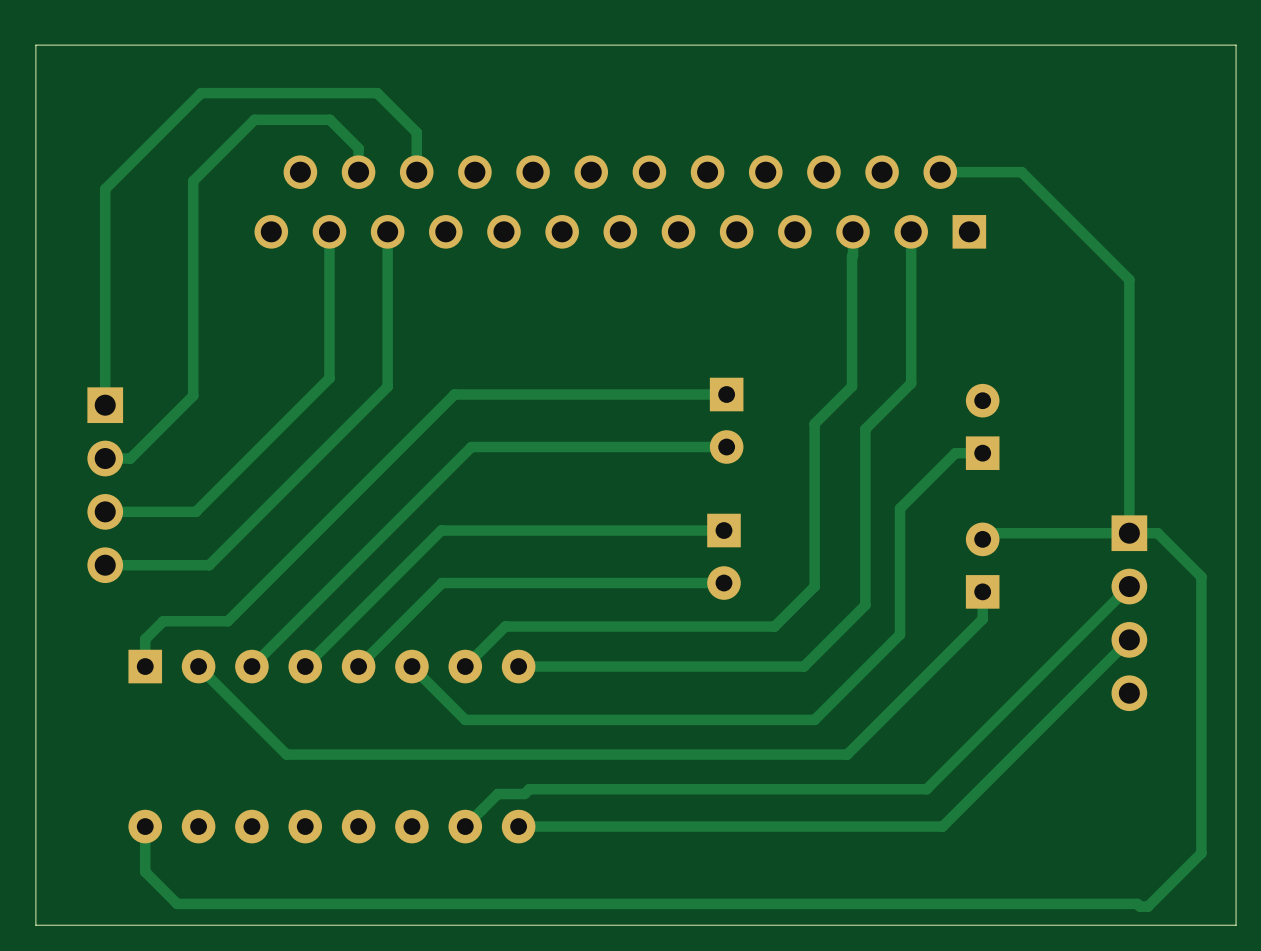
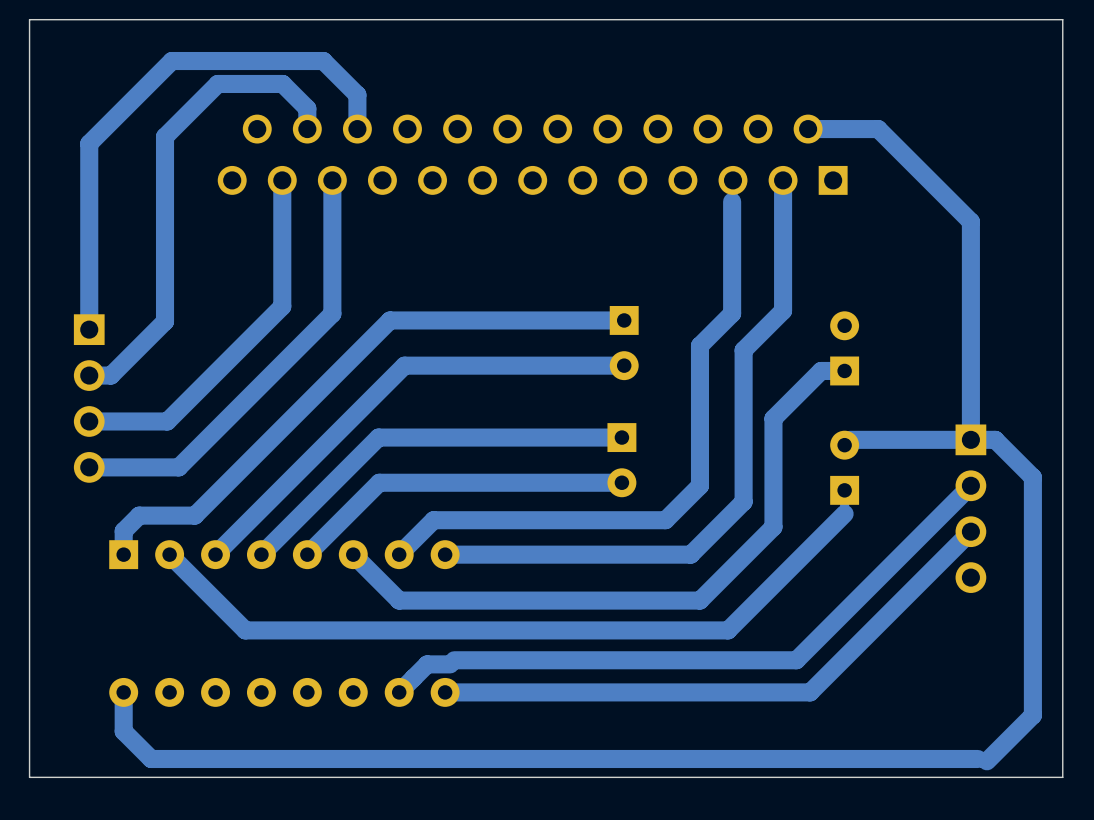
track width: thin (358, 172) (358, 148) (329, 119) (254, 119) (193, 181) (193, 395) (130, 458) (105, 458) -> thick (307, 129) (307, 108) (282, 83) (217, 83) (165, 136) (165, 321) (110, 375) (89, 375)
track width: thin (416, 172) (416, 132) (377, 93) (201, 93) (105, 189) (105, 405) -> thick (357, 129) (357, 94) (323, 61) (171, 61) (89, 143) (89, 329)
track width: thin (940, 172) (1021, 172) (1129, 279) (1129, 533) -> thick (808, 129) (878, 129) (970, 221) (970, 439)
track width: thin (329, 231) (329, 378) (195, 511) (105, 511) -> thick (282, 180) (282, 306) (167, 421) (89, 421)
track width: thin (387, 231) (387, 386) (209, 565) (105, 565) -> thick (332, 180) (332, 313) (178, 467) (89, 467)
track width: thin (911, 231) (911, 383) (865, 429) (865, 605) (803, 666) (518, 666) -> thick (783, 180) (783, 310) (743, 350) (743, 501) (690, 554) (445, 554)
track width: thin (852, 256) (852, 386) (814, 423) (814, 586) (774, 626) (505, 626) (465, 666) -> thick (732, 201) (732, 313) (699, 345) (699, 485) (665, 520) (433, 520) (399, 554)
track width: thin (726, 394) (454, 394) (227, 621) (163, 621) (145, 639) (145, 666) -> thick (624, 320) (390, 320) (194, 515) (139, 515) (123, 531) (123, 554)
track width: thin (726, 447) (471, 447) (251, 666) -> thick (624, 365) (404, 365) (215, 554)
track width: thin (982, 453) (955, 453) (900, 508) (900, 634) (814, 719) (465, 719) (411, 666) -> thick (844, 370) (821, 370) (773, 418) (773, 527) (699, 600) (399, 600) (353, 554)
track width: thin (723, 530) (441, 530) (305, 666) -> thick (621, 437) (378, 437) (261, 554)
track width: thin (988, 533) (1157, 533) (1201, 576) (1201, 853) (1148, 906) -> thick (849, 439) (995, 439) (1032, 477) (1032, 715) (986, 761)
track width: thin (723, 583) (442, 583) (358, 666) -> thick (621, 482) (379, 482) (307, 554)
track width: thin (1129, 586) (926, 789) (529, 789) -> thick (970, 485) (796, 660) (454, 660)
track width: thin (982, 619) (847, 754) (286, 754) (198, 666) -> thick (844, 513) (728, 630) (245, 630) (169, 554)
track width: thin (1129, 639) (942, 826) (518, 826) -> thick (970, 531) (810, 692) (445, 692)
track width: thin (524, 794) (497, 794) (465, 826) -> thick (450, 664) (427, 664) (399, 692)
track width: thin (145, 826) (145, 871) (177, 903) (1137, 903) -> thick (123, 692) (123, 731) (151, 758) (977, 758)

